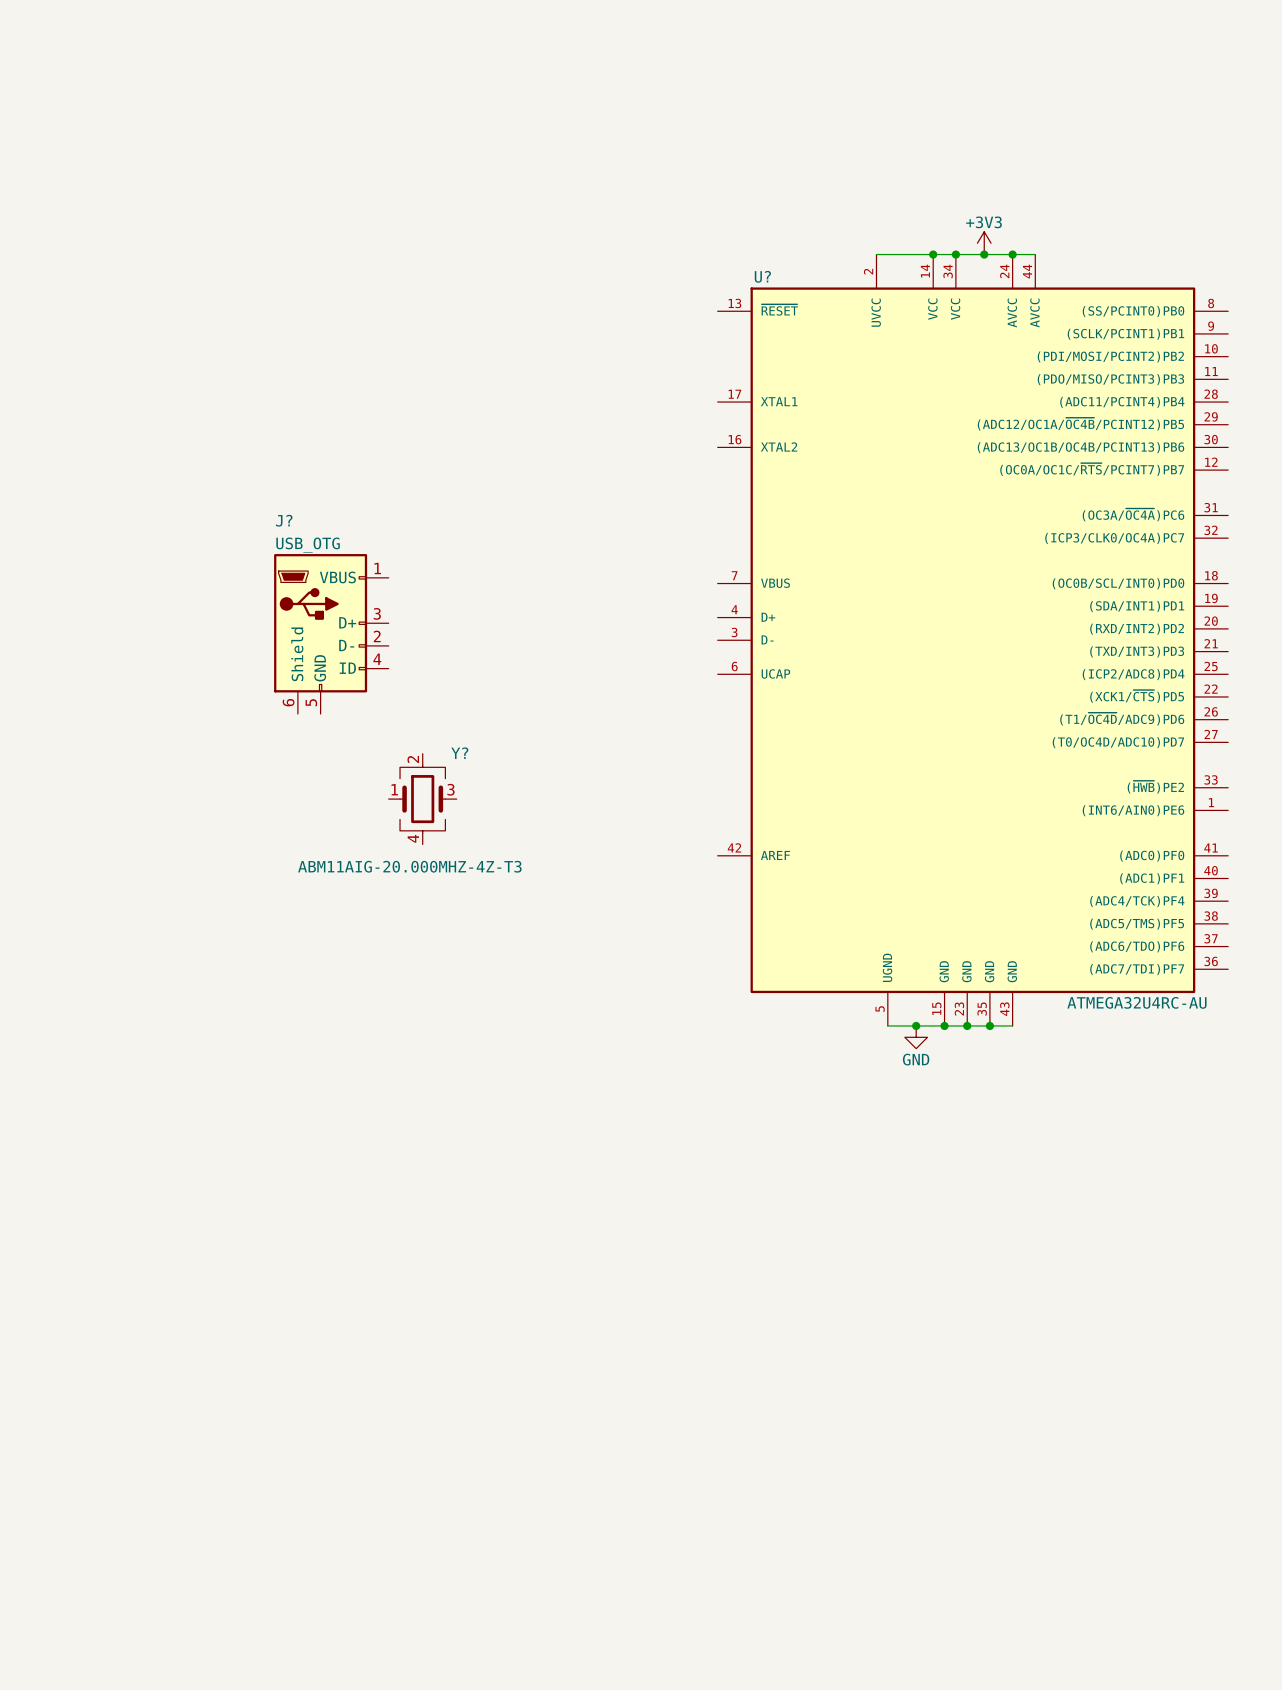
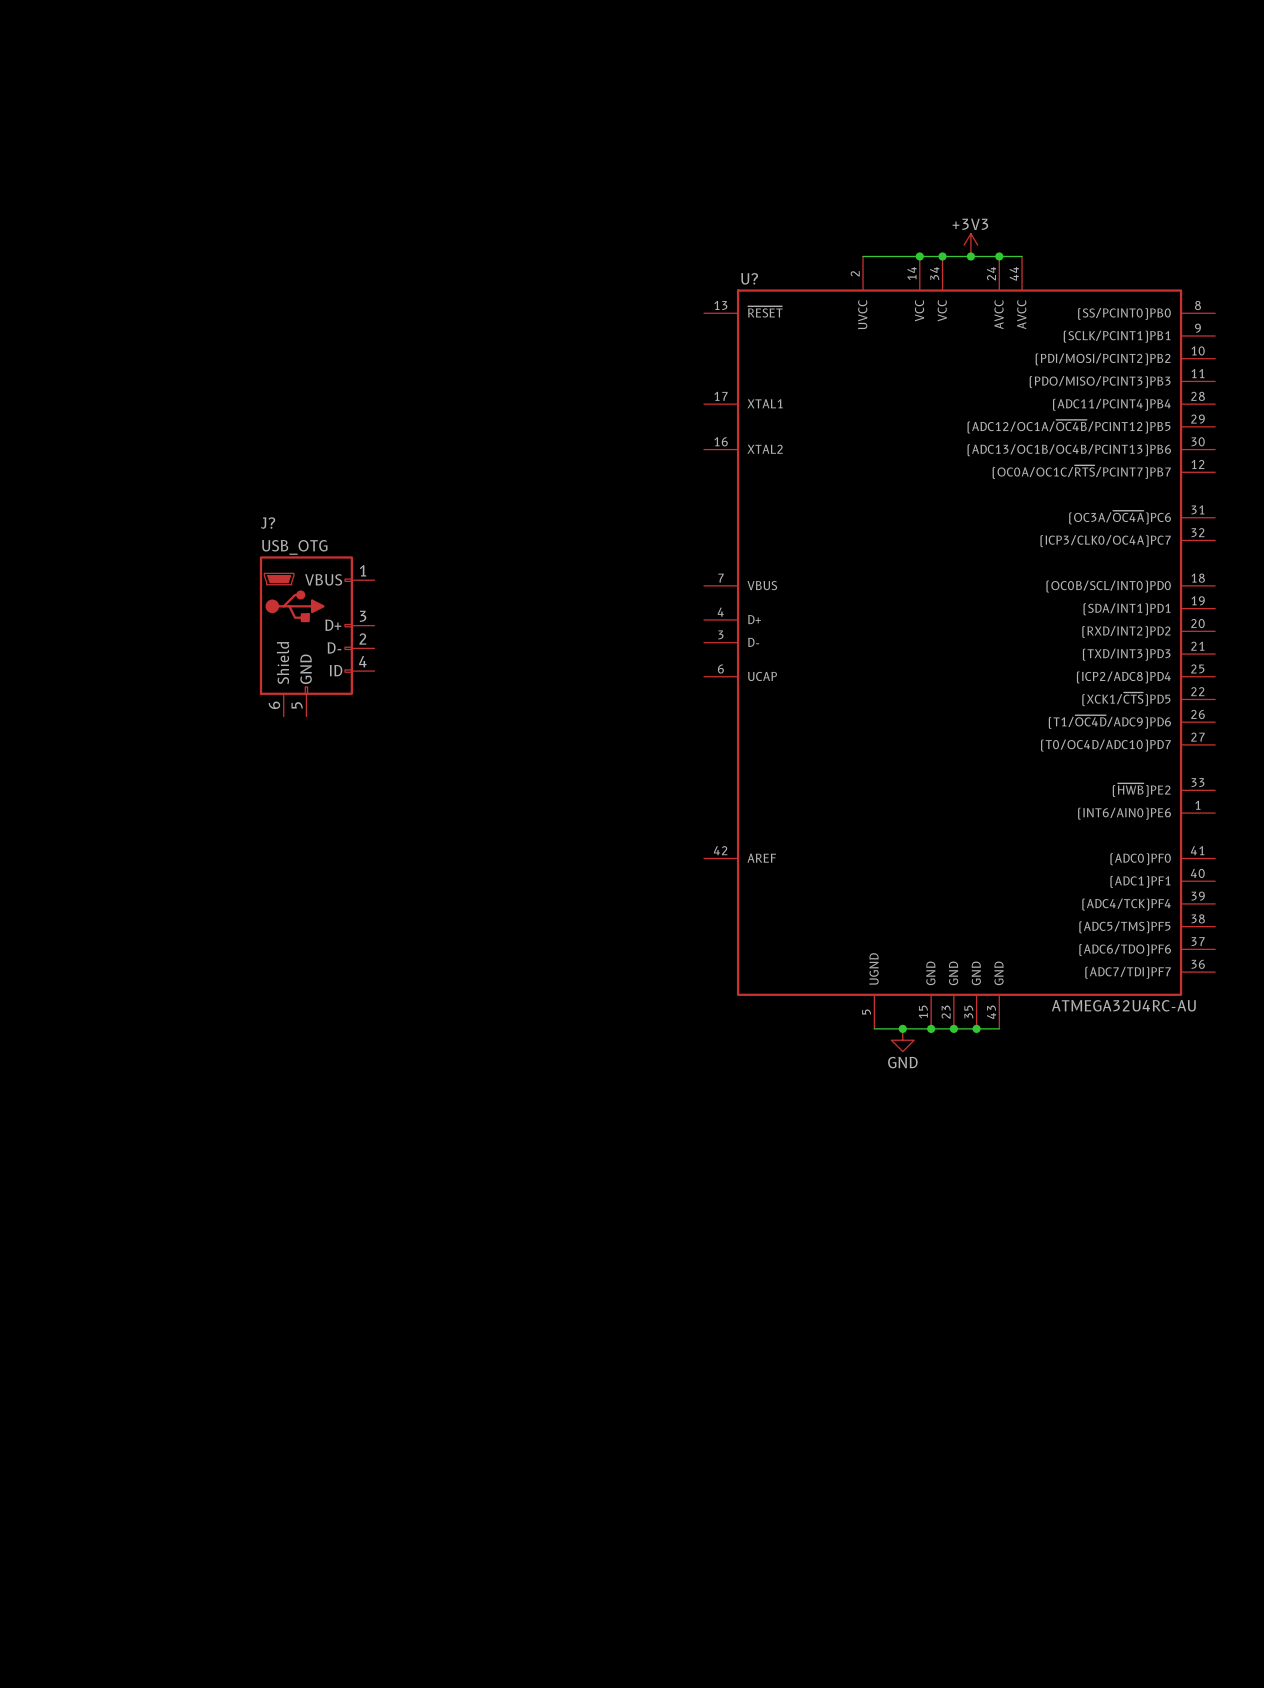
Y?: ABM11AIG-20.000MHZ-4Z-T3 (422, 799) -> none

